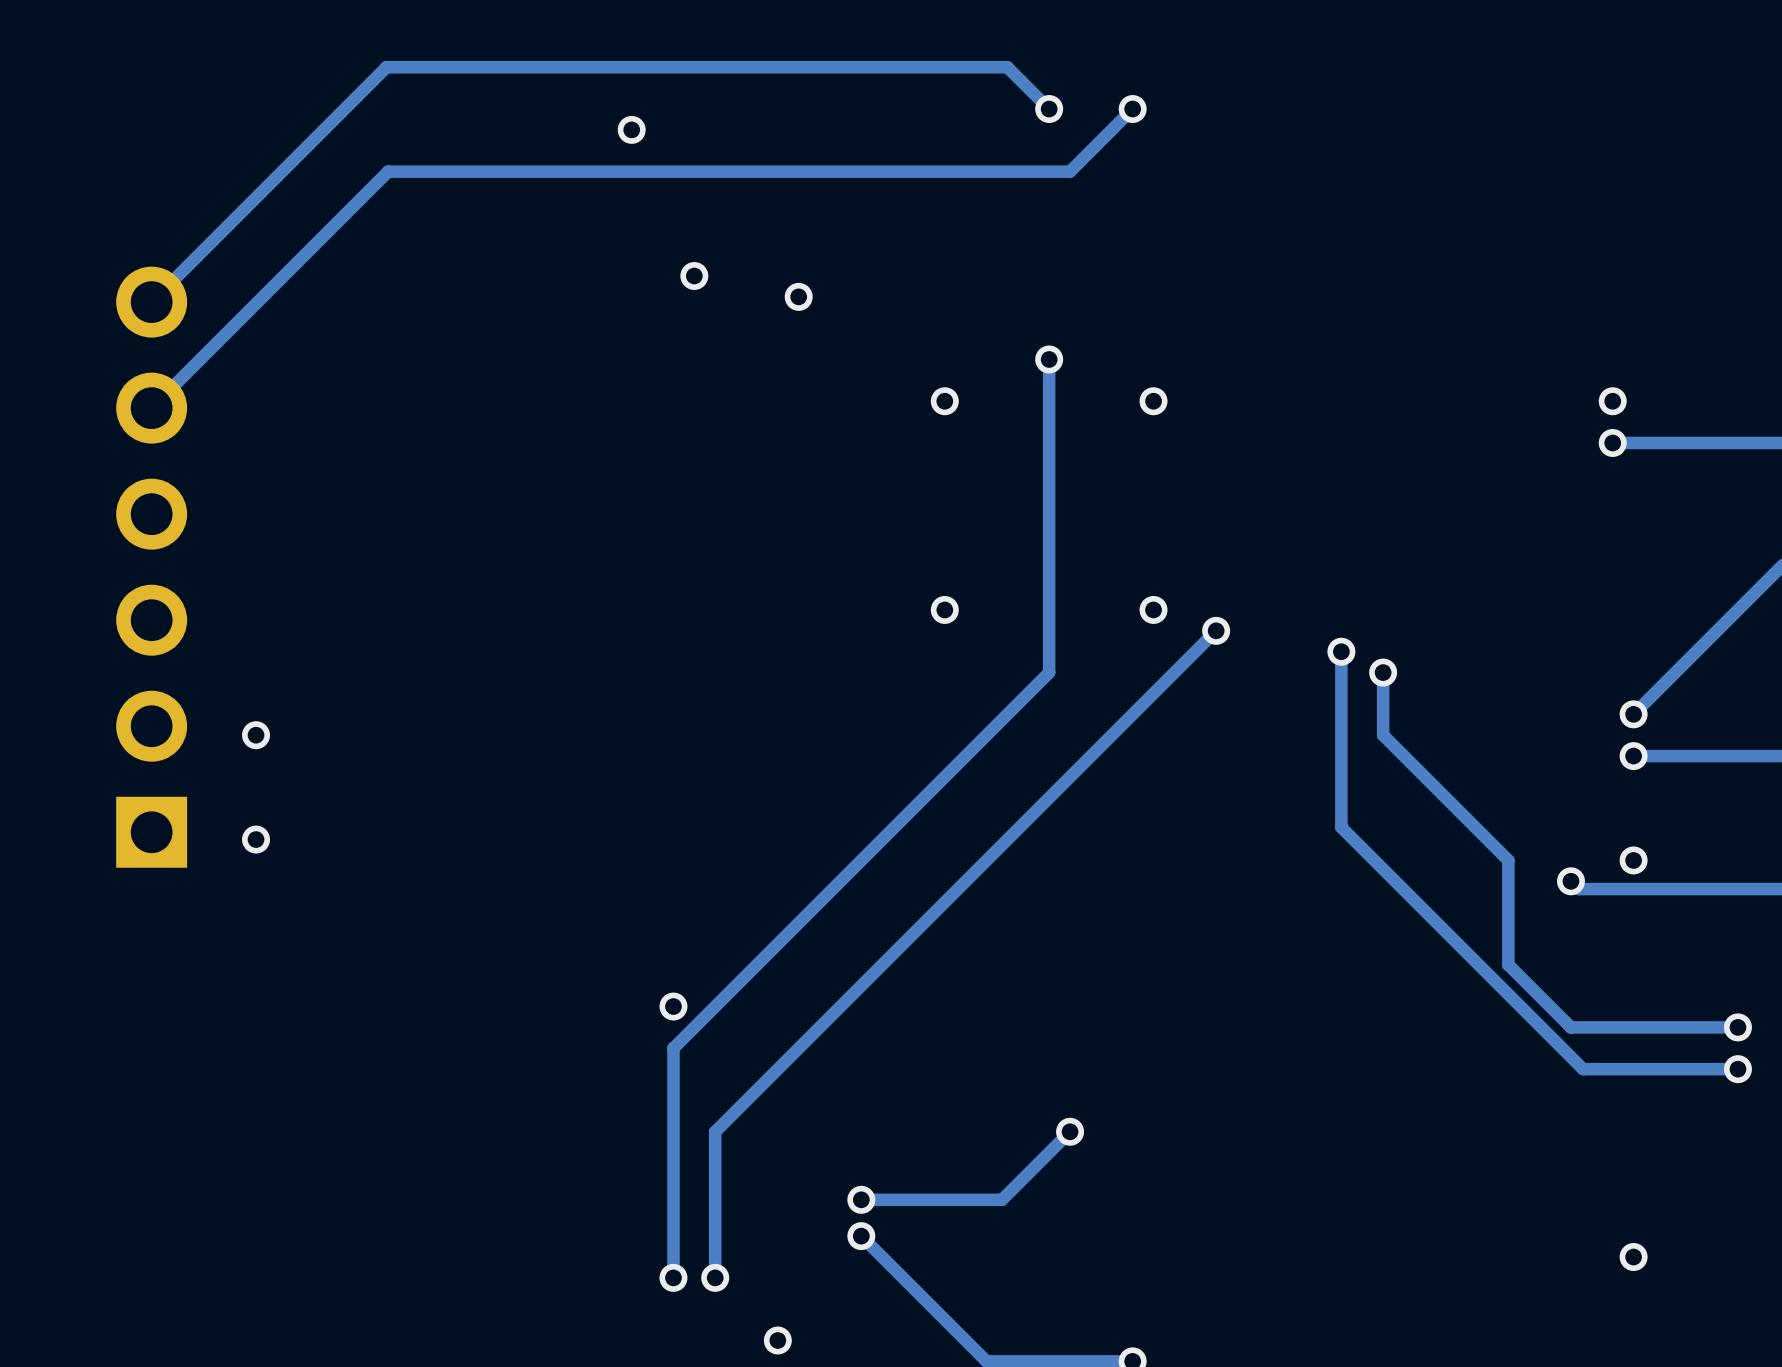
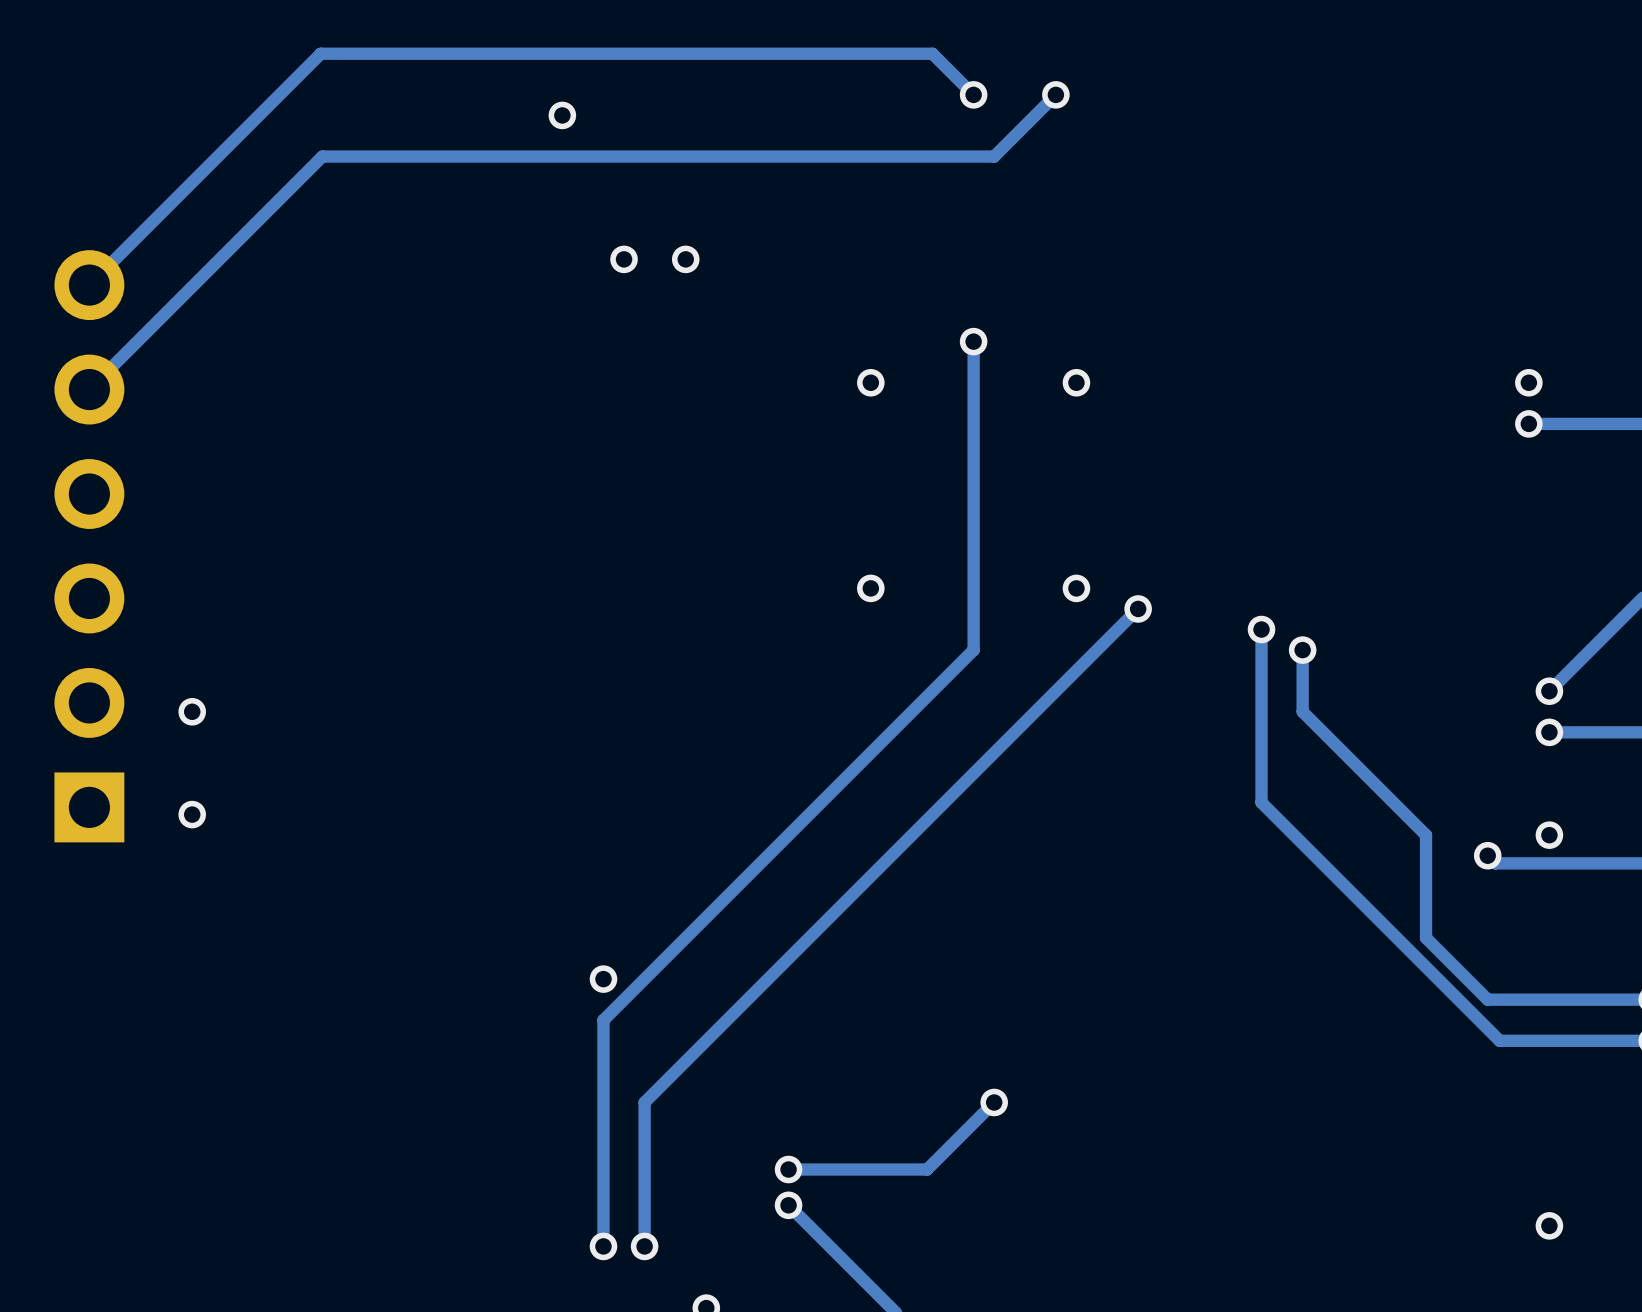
via position: (798, 296) -> (685, 259)

